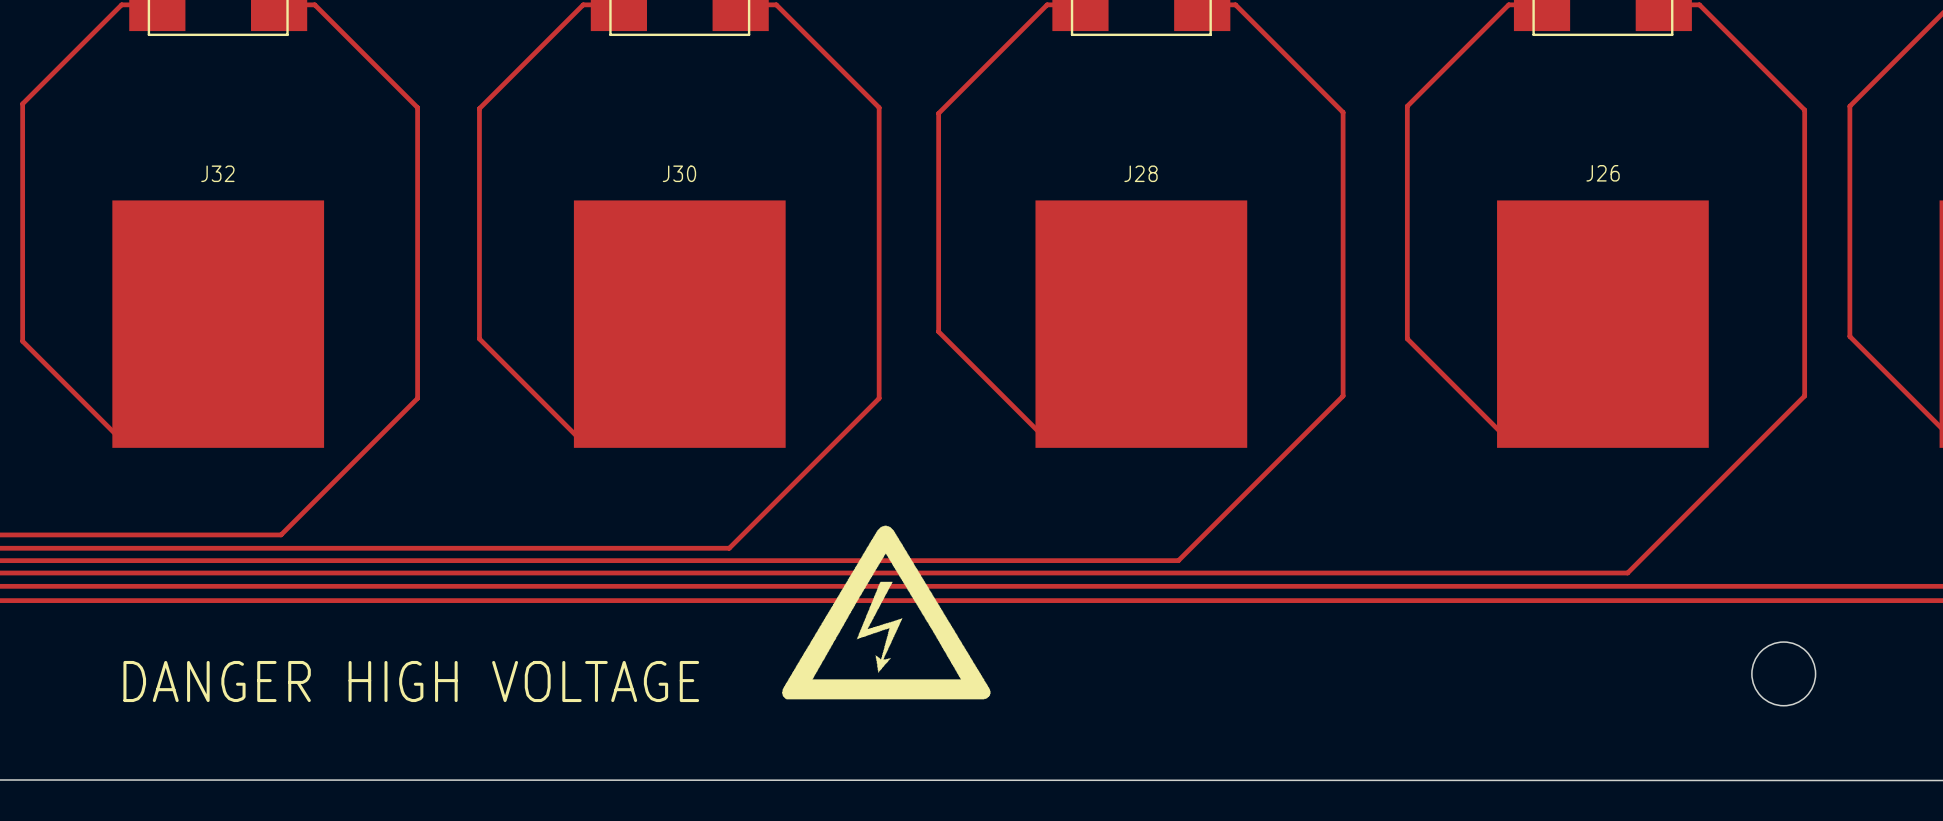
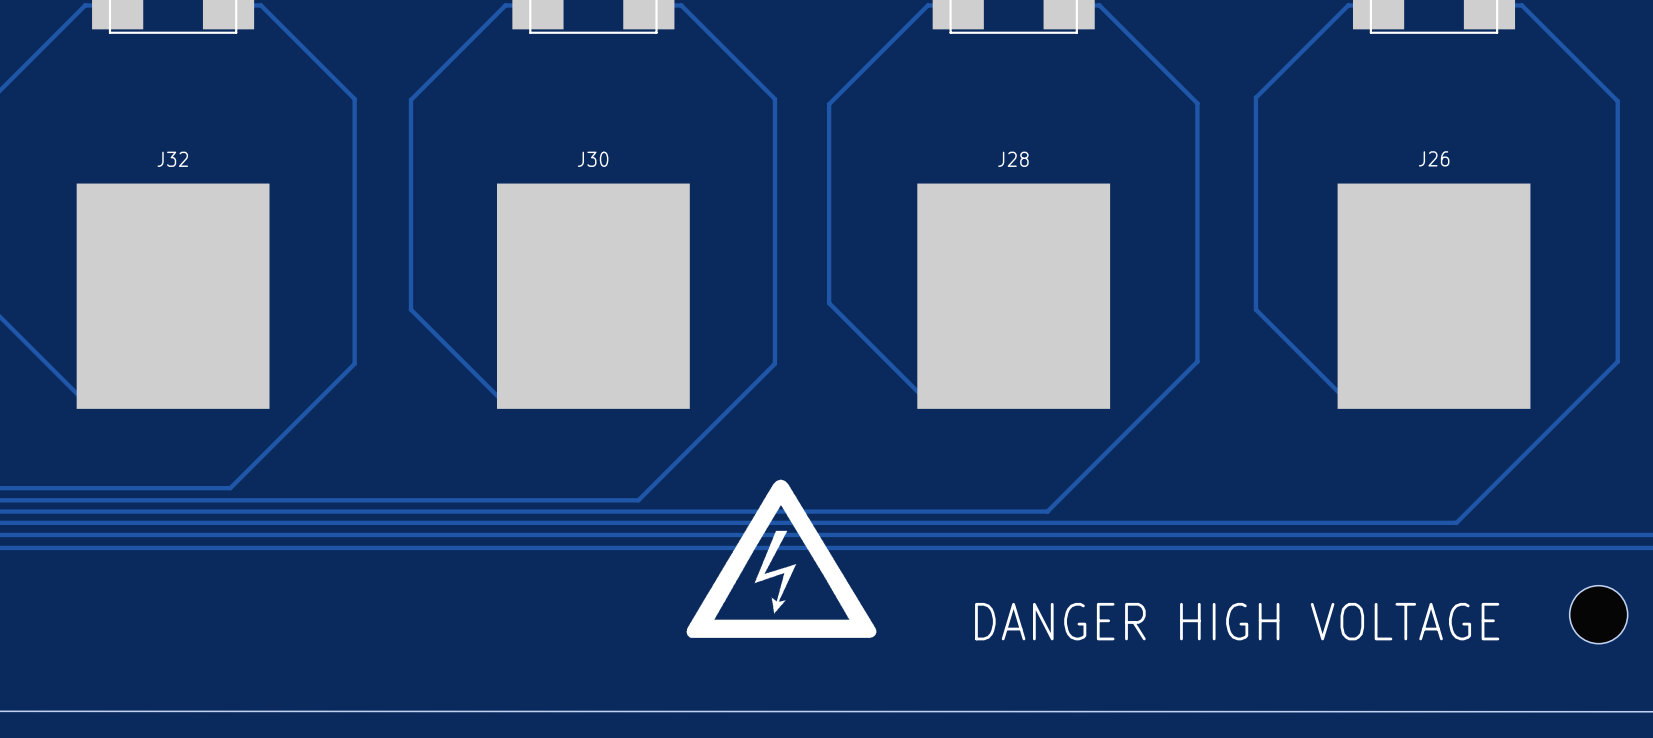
drawing: [123, 660, 700, 703] -> none
drawing: none -> [975, 602, 1500, 641]

